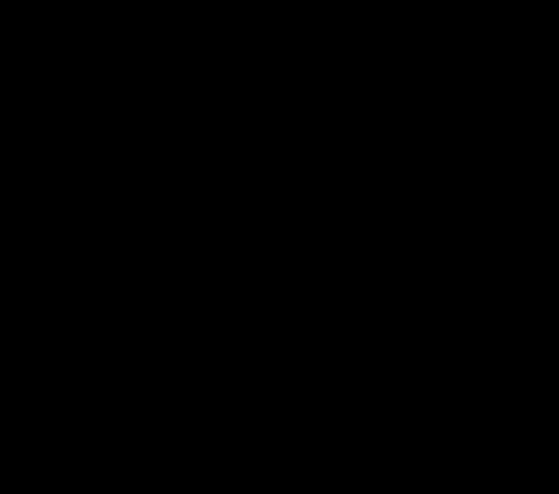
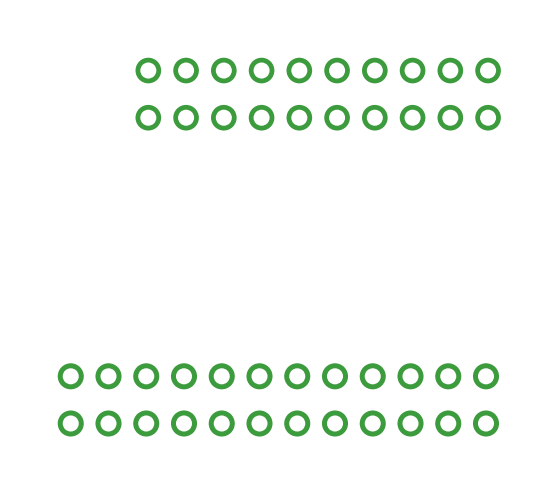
part: none -> (318, 94)
part: none -> (278, 399)

